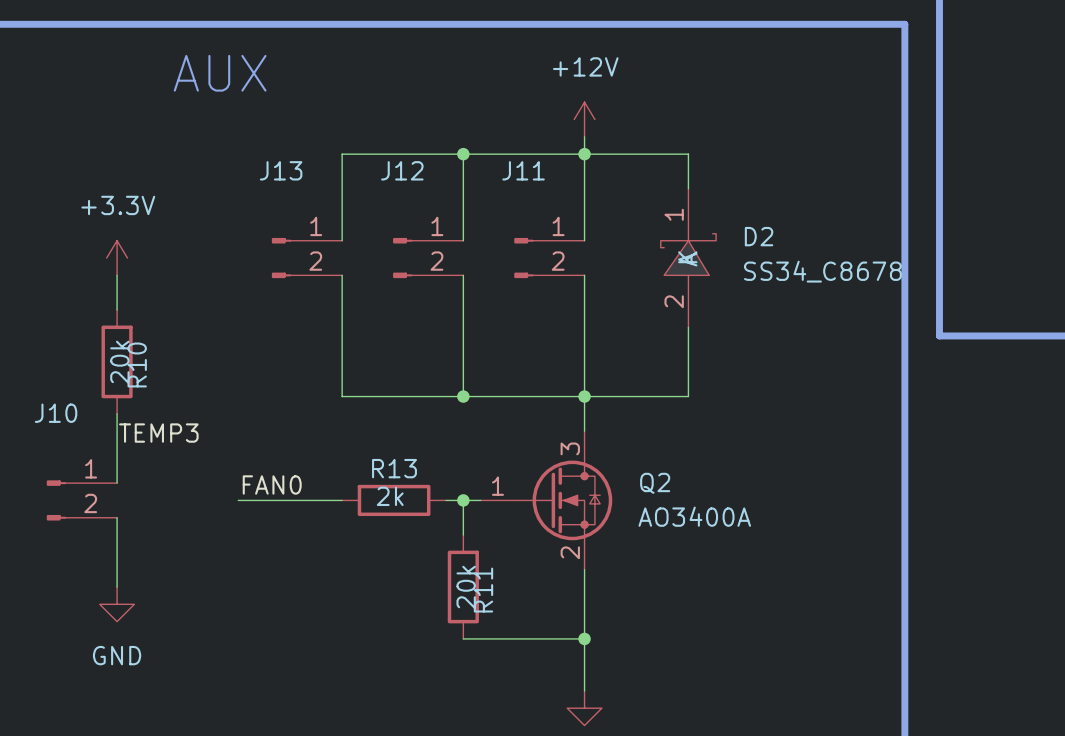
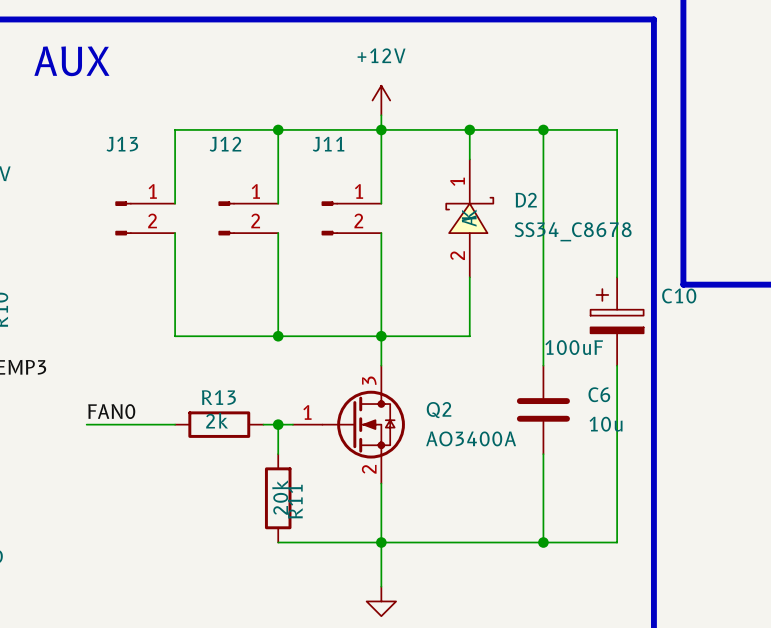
wire: none -> (469, 129) (617, 129) (617, 277)
junction: none -> (469, 129)
wire: none -> (543, 129) (543, 365)
junction: none -> (543, 129)
C10: none -> 100uF (617, 321)
wire: none -> (617, 365) (617, 542) (381, 542)
C6: none -> 10u (543, 409)
wire: none -> (543, 454) (543, 542)
junction: none -> (543, 542)

